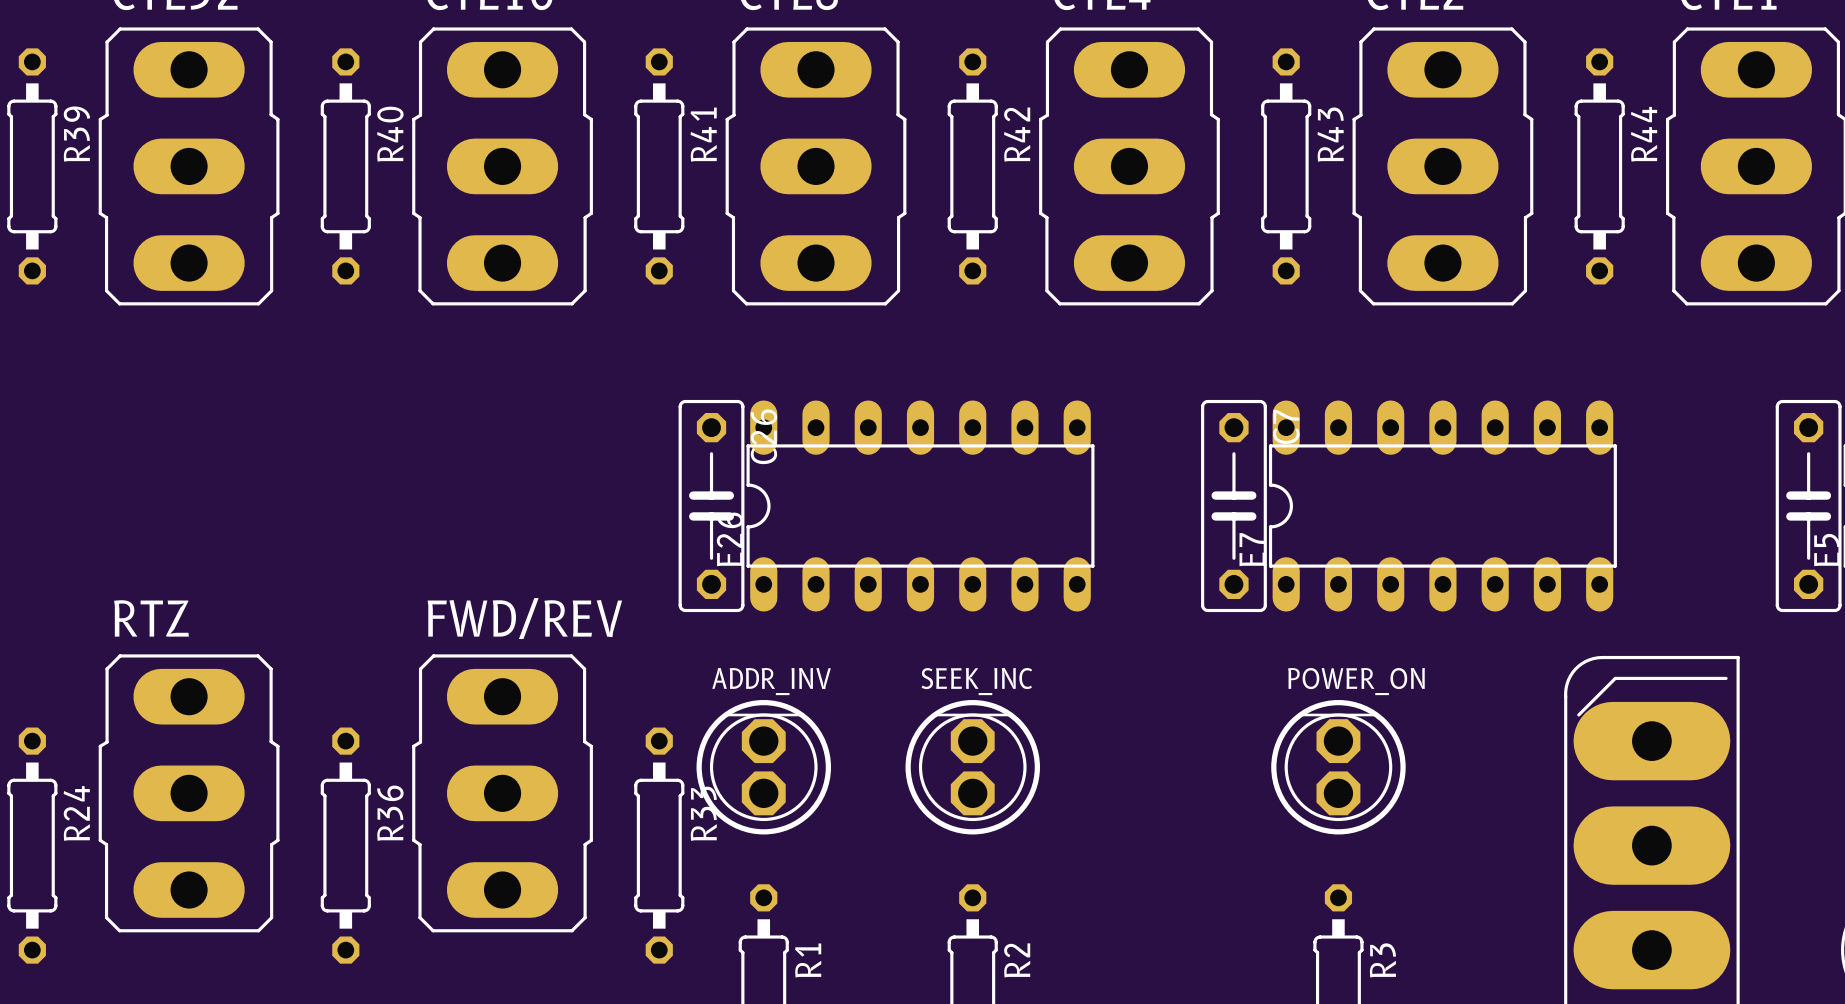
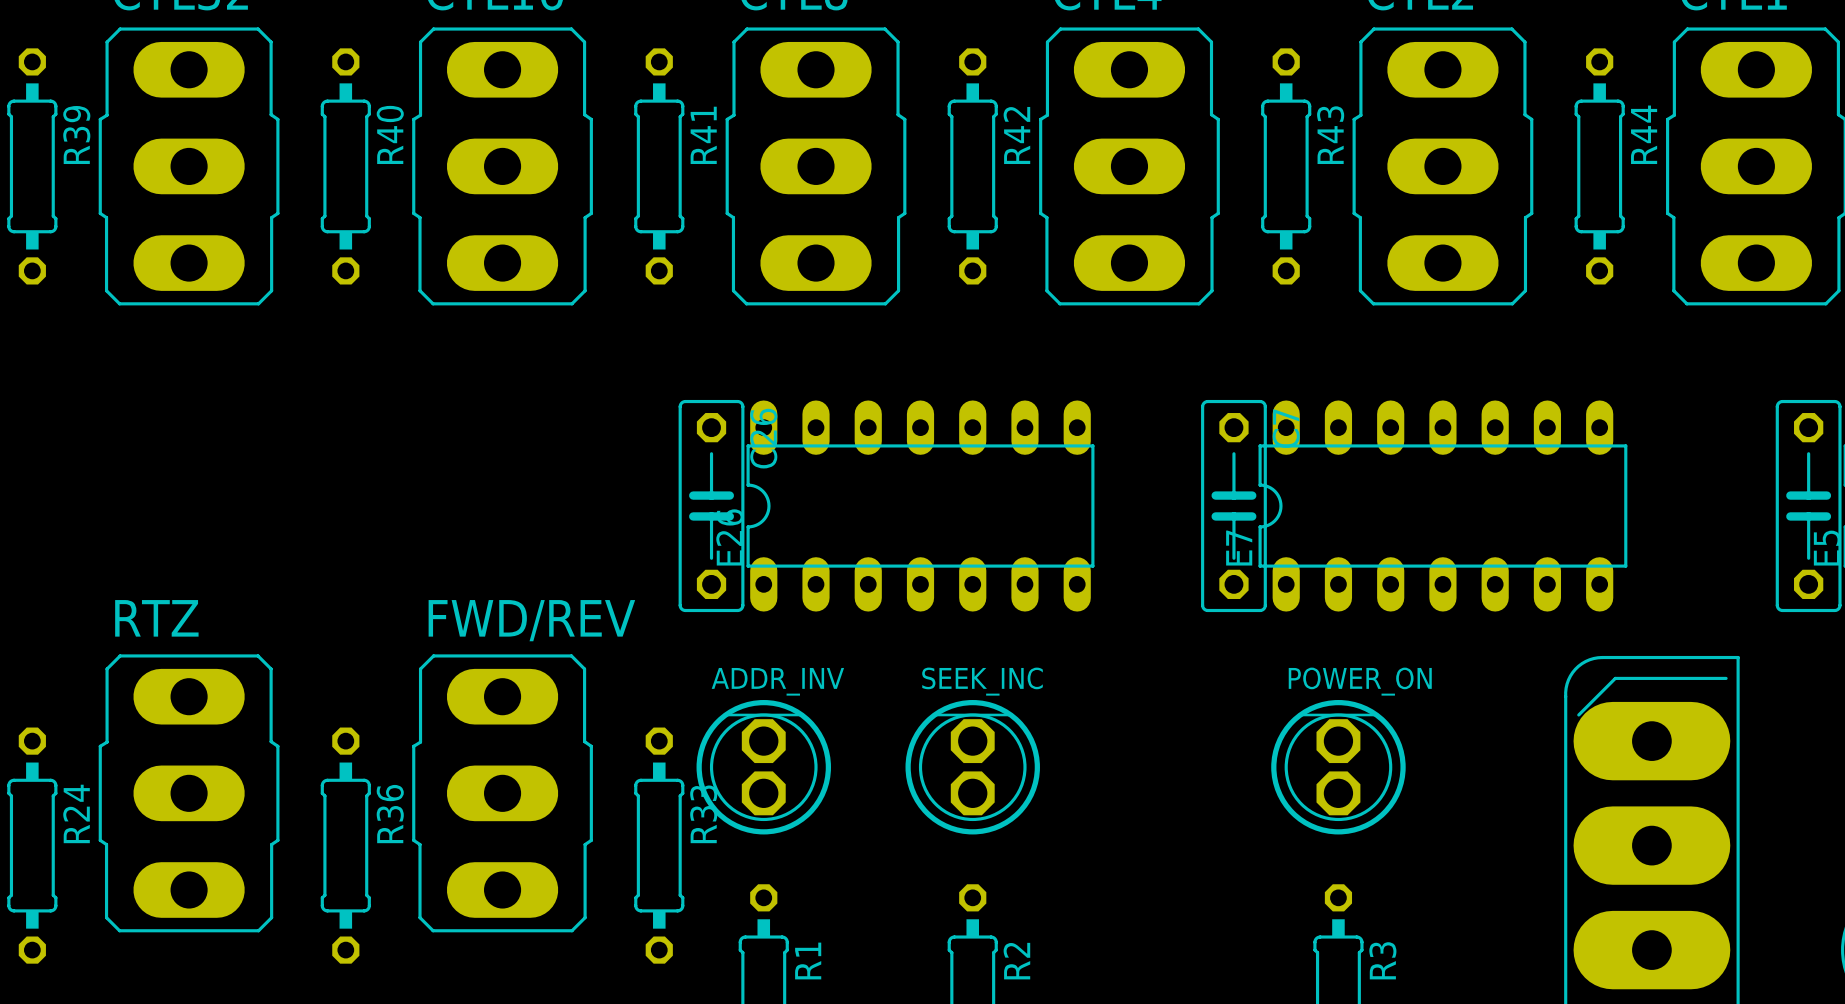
E7 footprint: [1268, 400, 1617, 612] -> [1258, 400, 1628, 612]
E7 name position: E7 (1252, 549) -> E7 (1239, 548)

